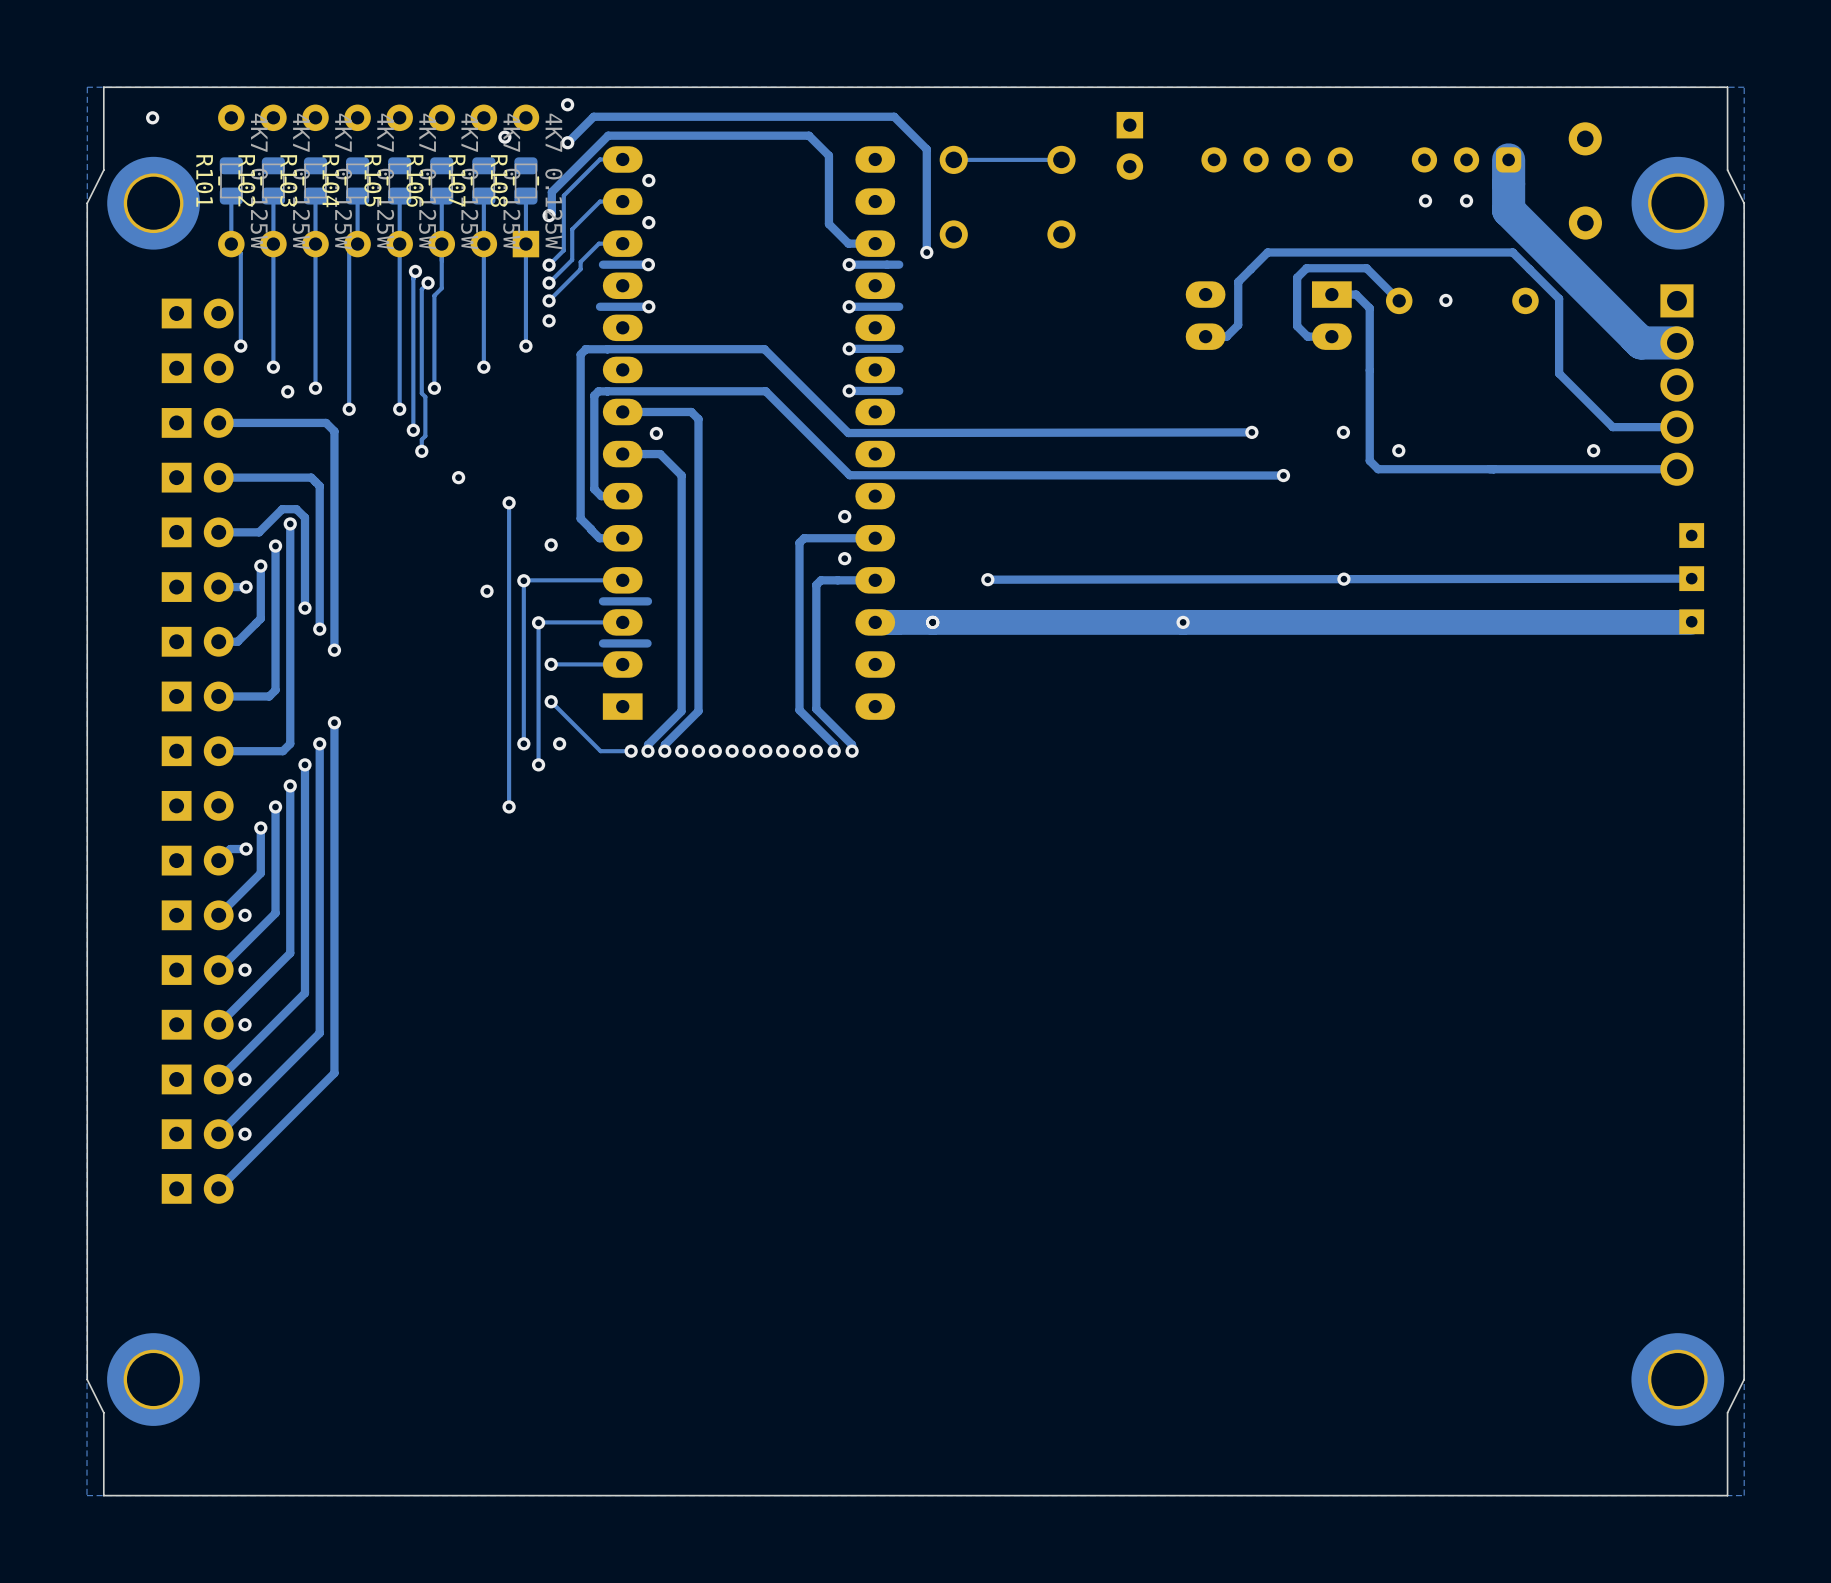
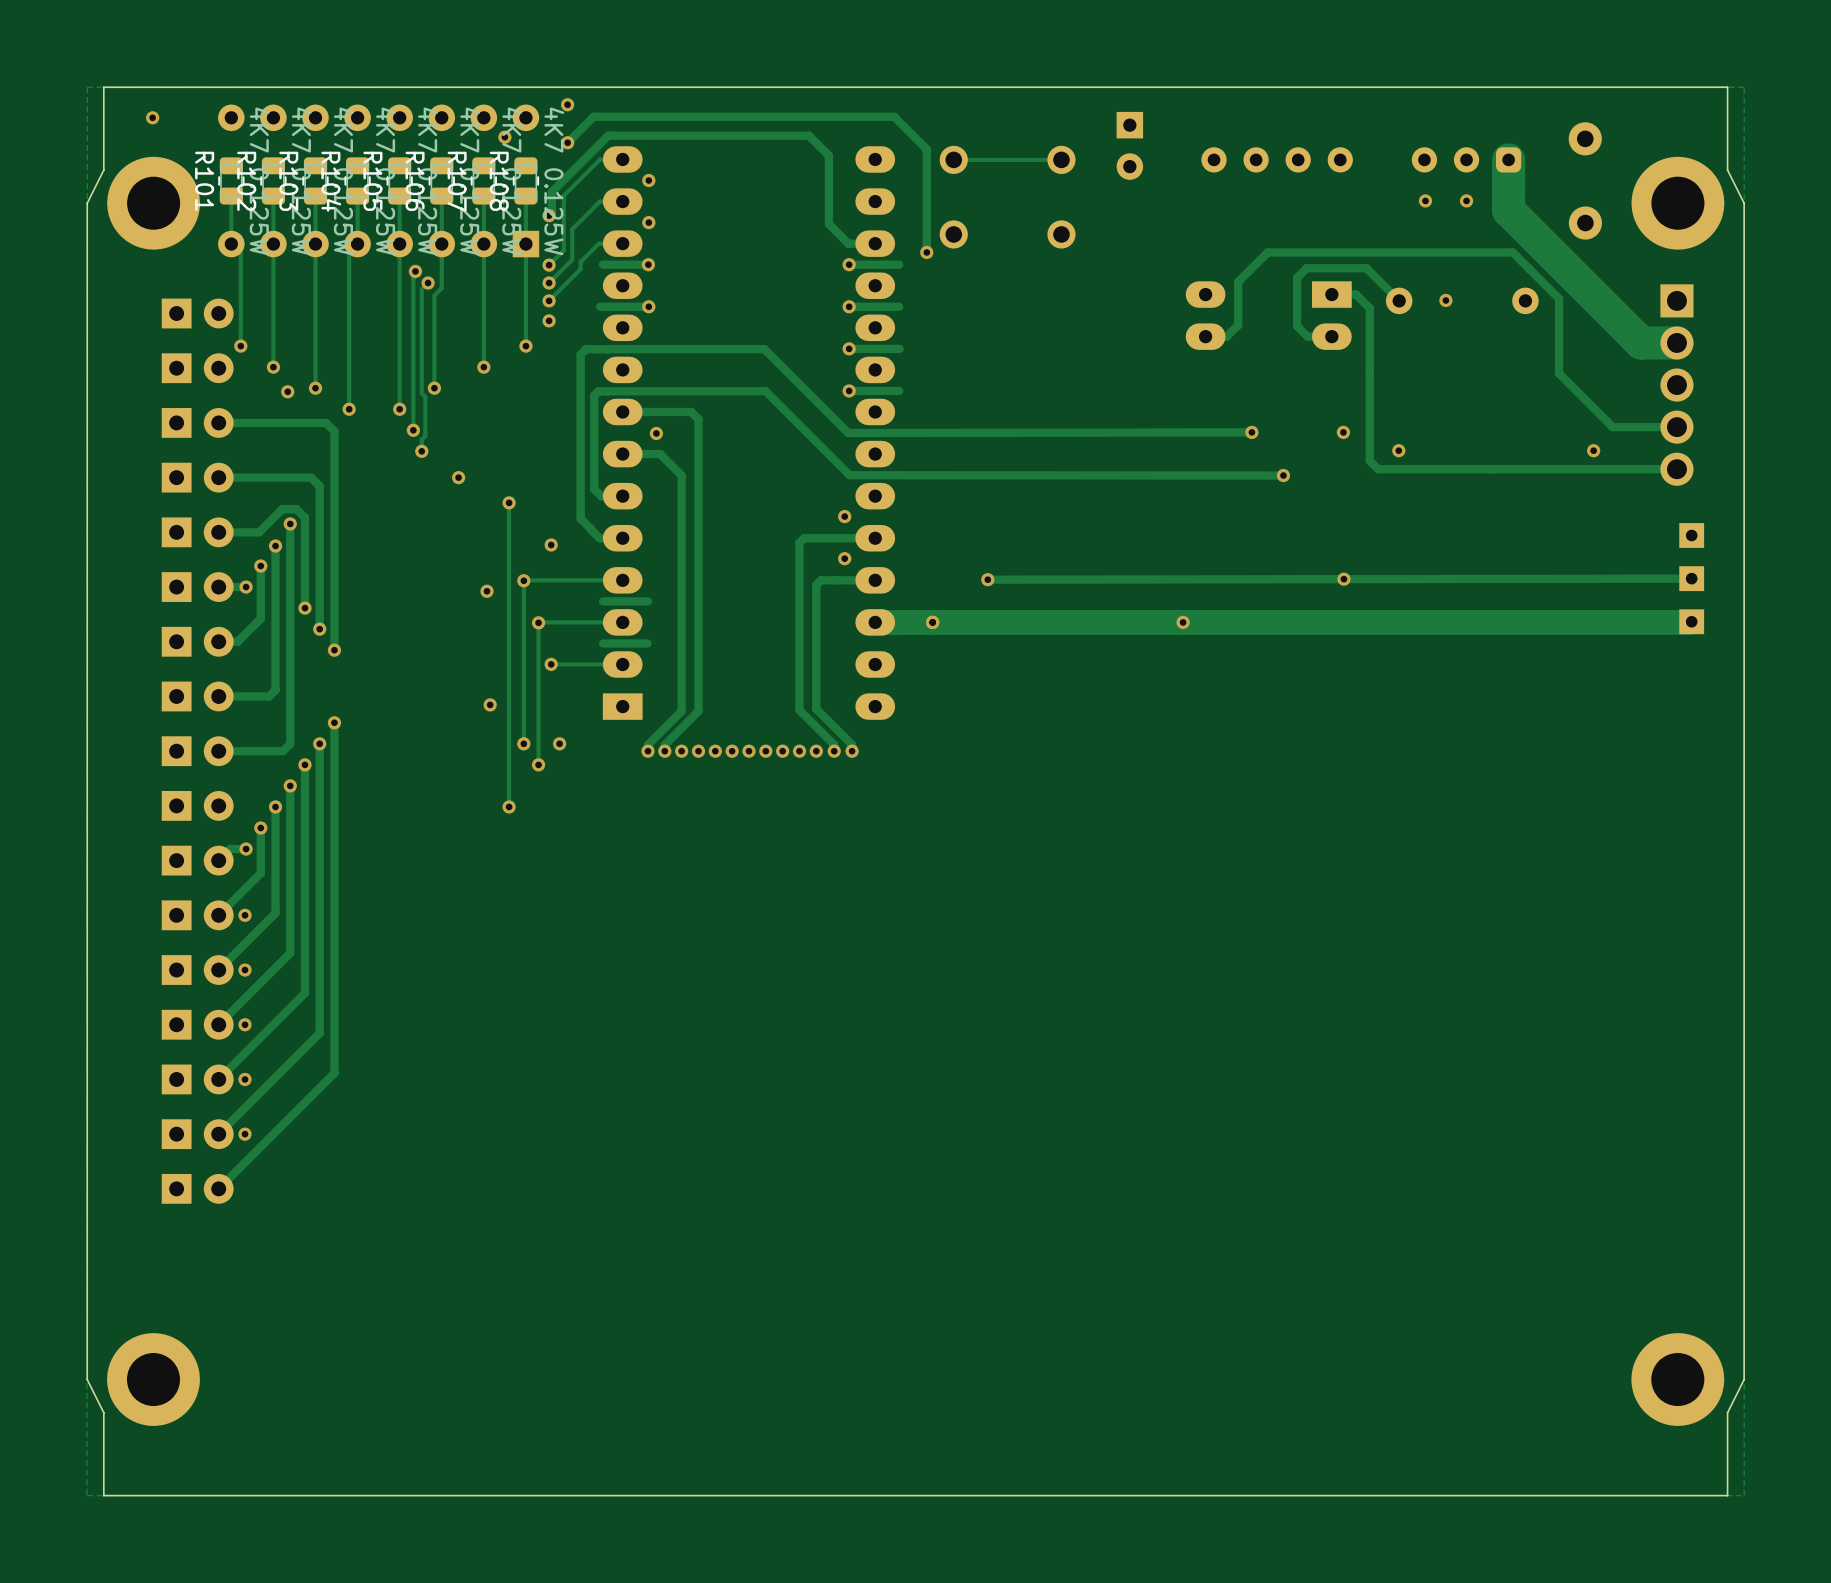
track: (551, 701) (600, 751) (631, 751) -> none
via position: (551, 701) -> (490, 704)
via: (631, 751) -> none

